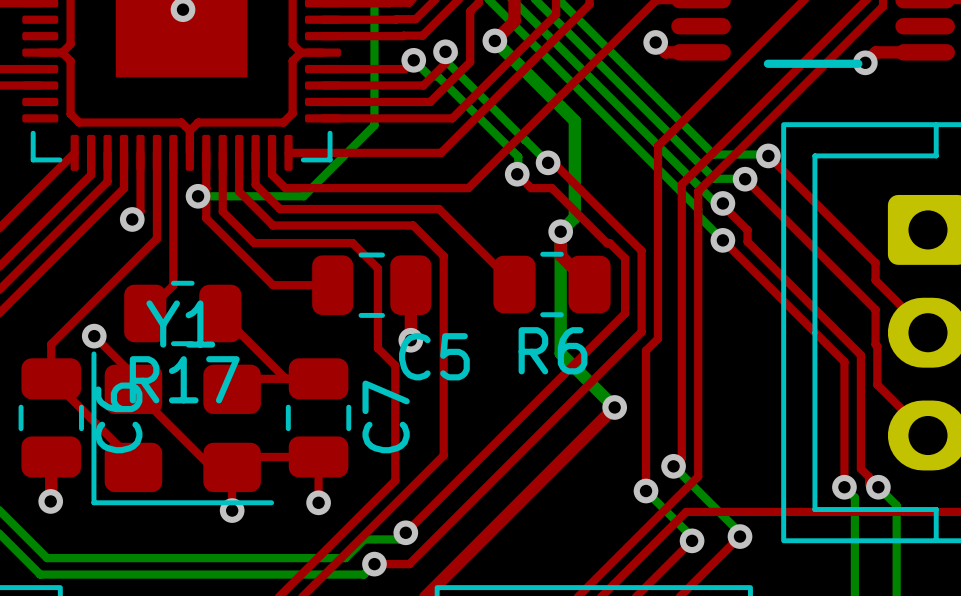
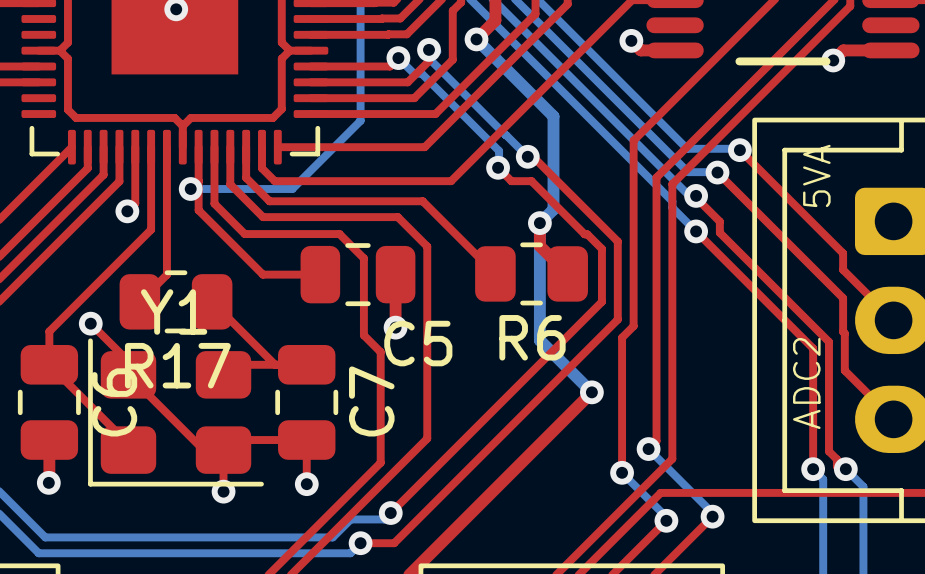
text: none -> 5VA (816, 175)
text: none -> ADC2 (806, 383)

